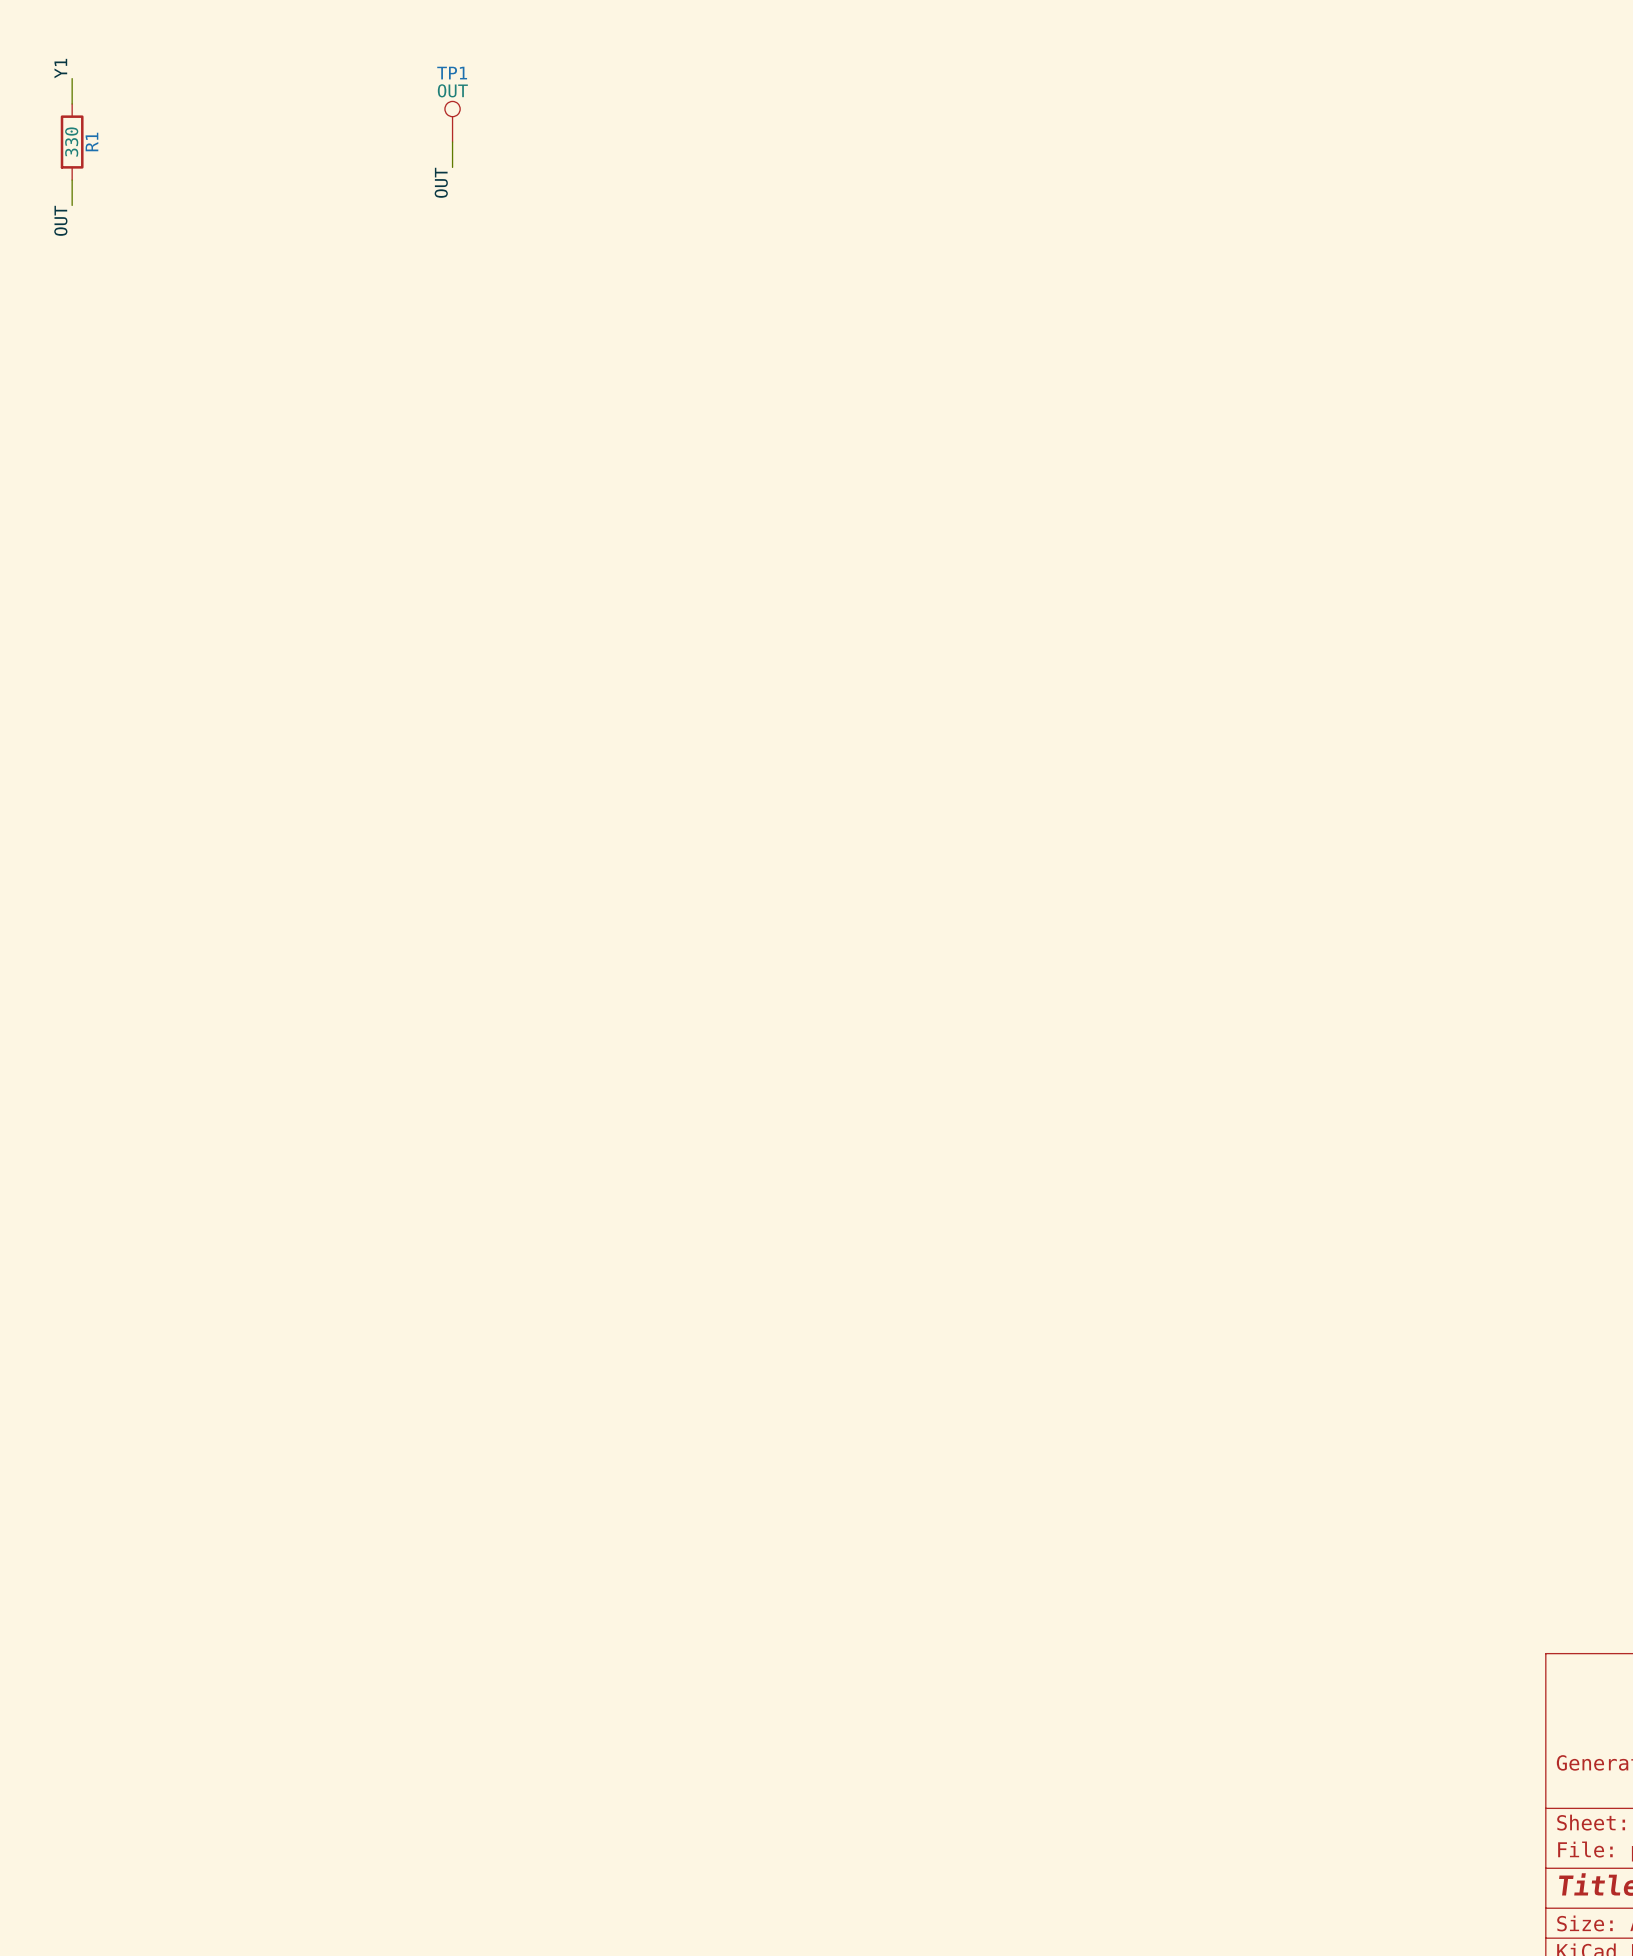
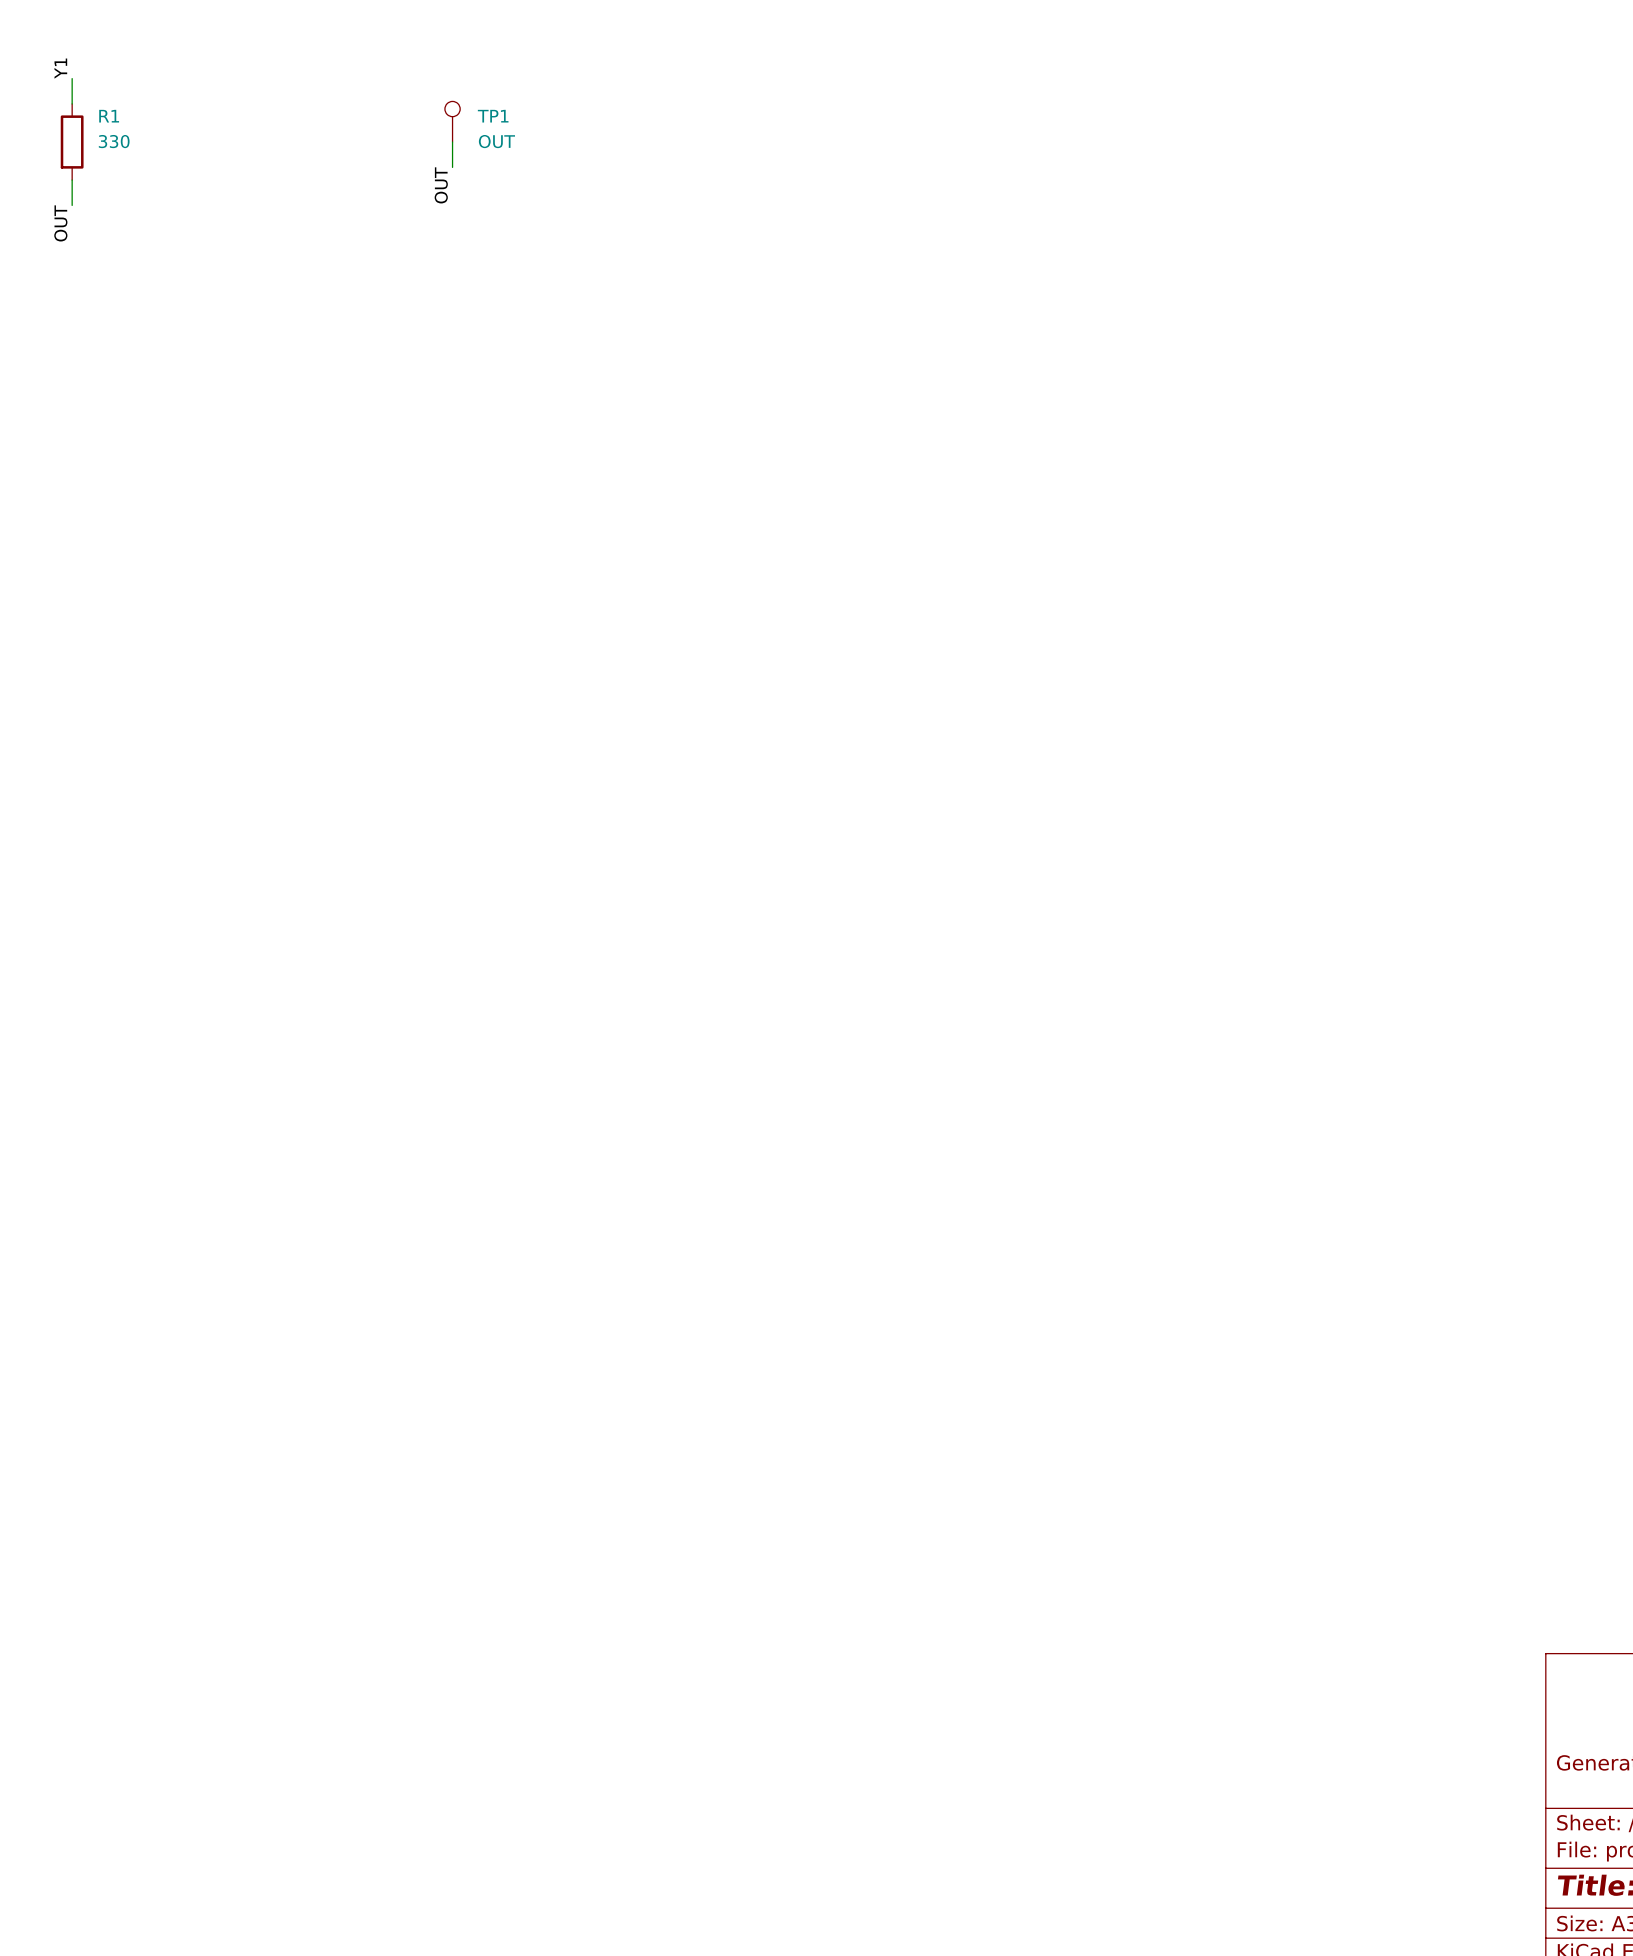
TP1 name position: TP1 (452, 73) -> TP1 (493, 116)
TP1 value position: OUT (452, 90) -> OUT (496, 141)
R1 value rotation: 0° (71, 142) -> 90° clockwise (114, 141)
R1 value position: 330 (71, 142) -> 330 (114, 141)
R1 name rotation: 0° (91, 142) -> 90° clockwise (109, 116)
R1 name position: R1 (91, 142) -> R1 (109, 116)

